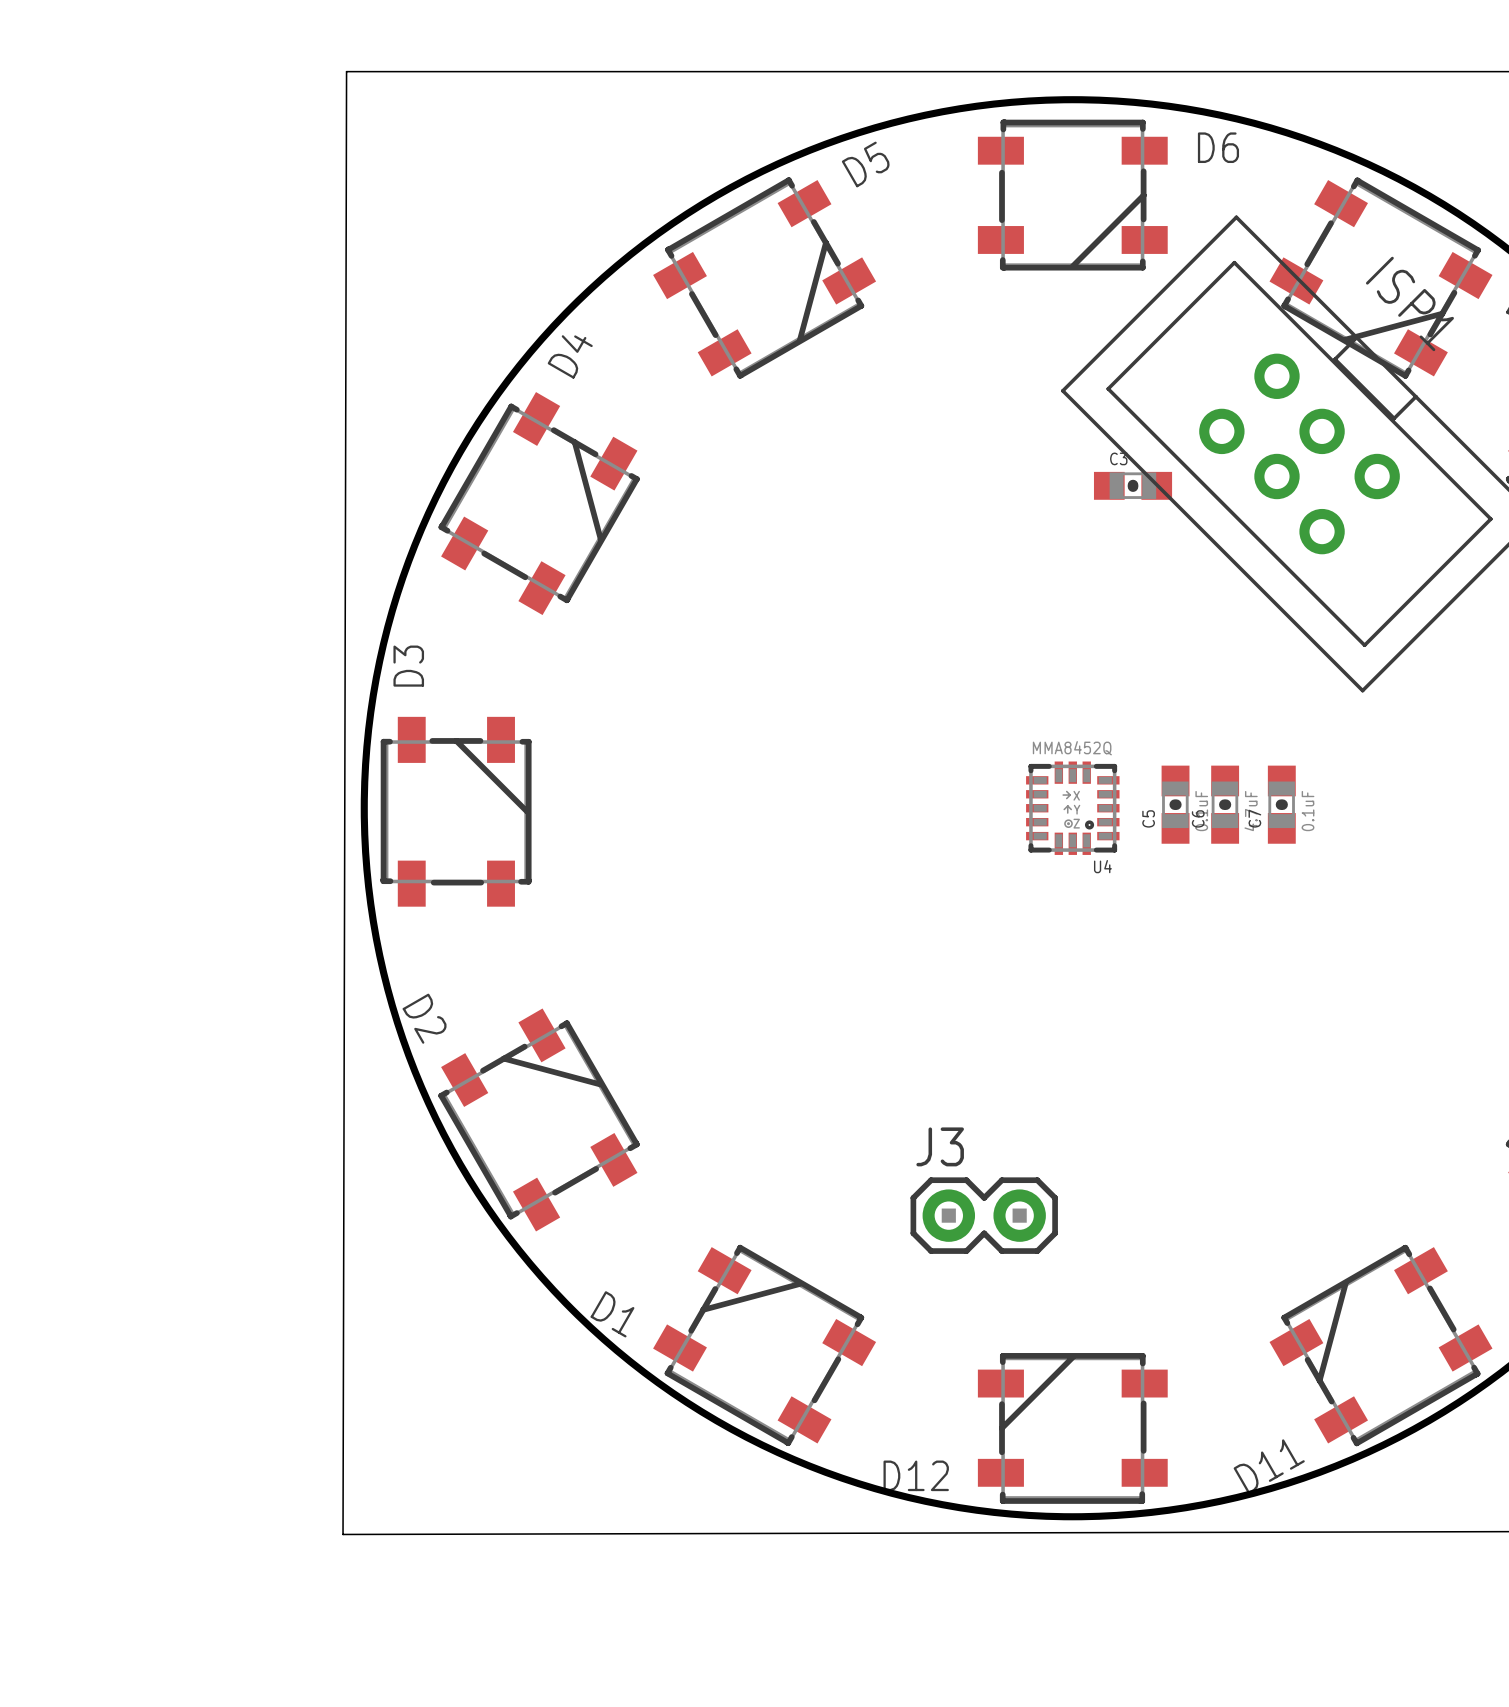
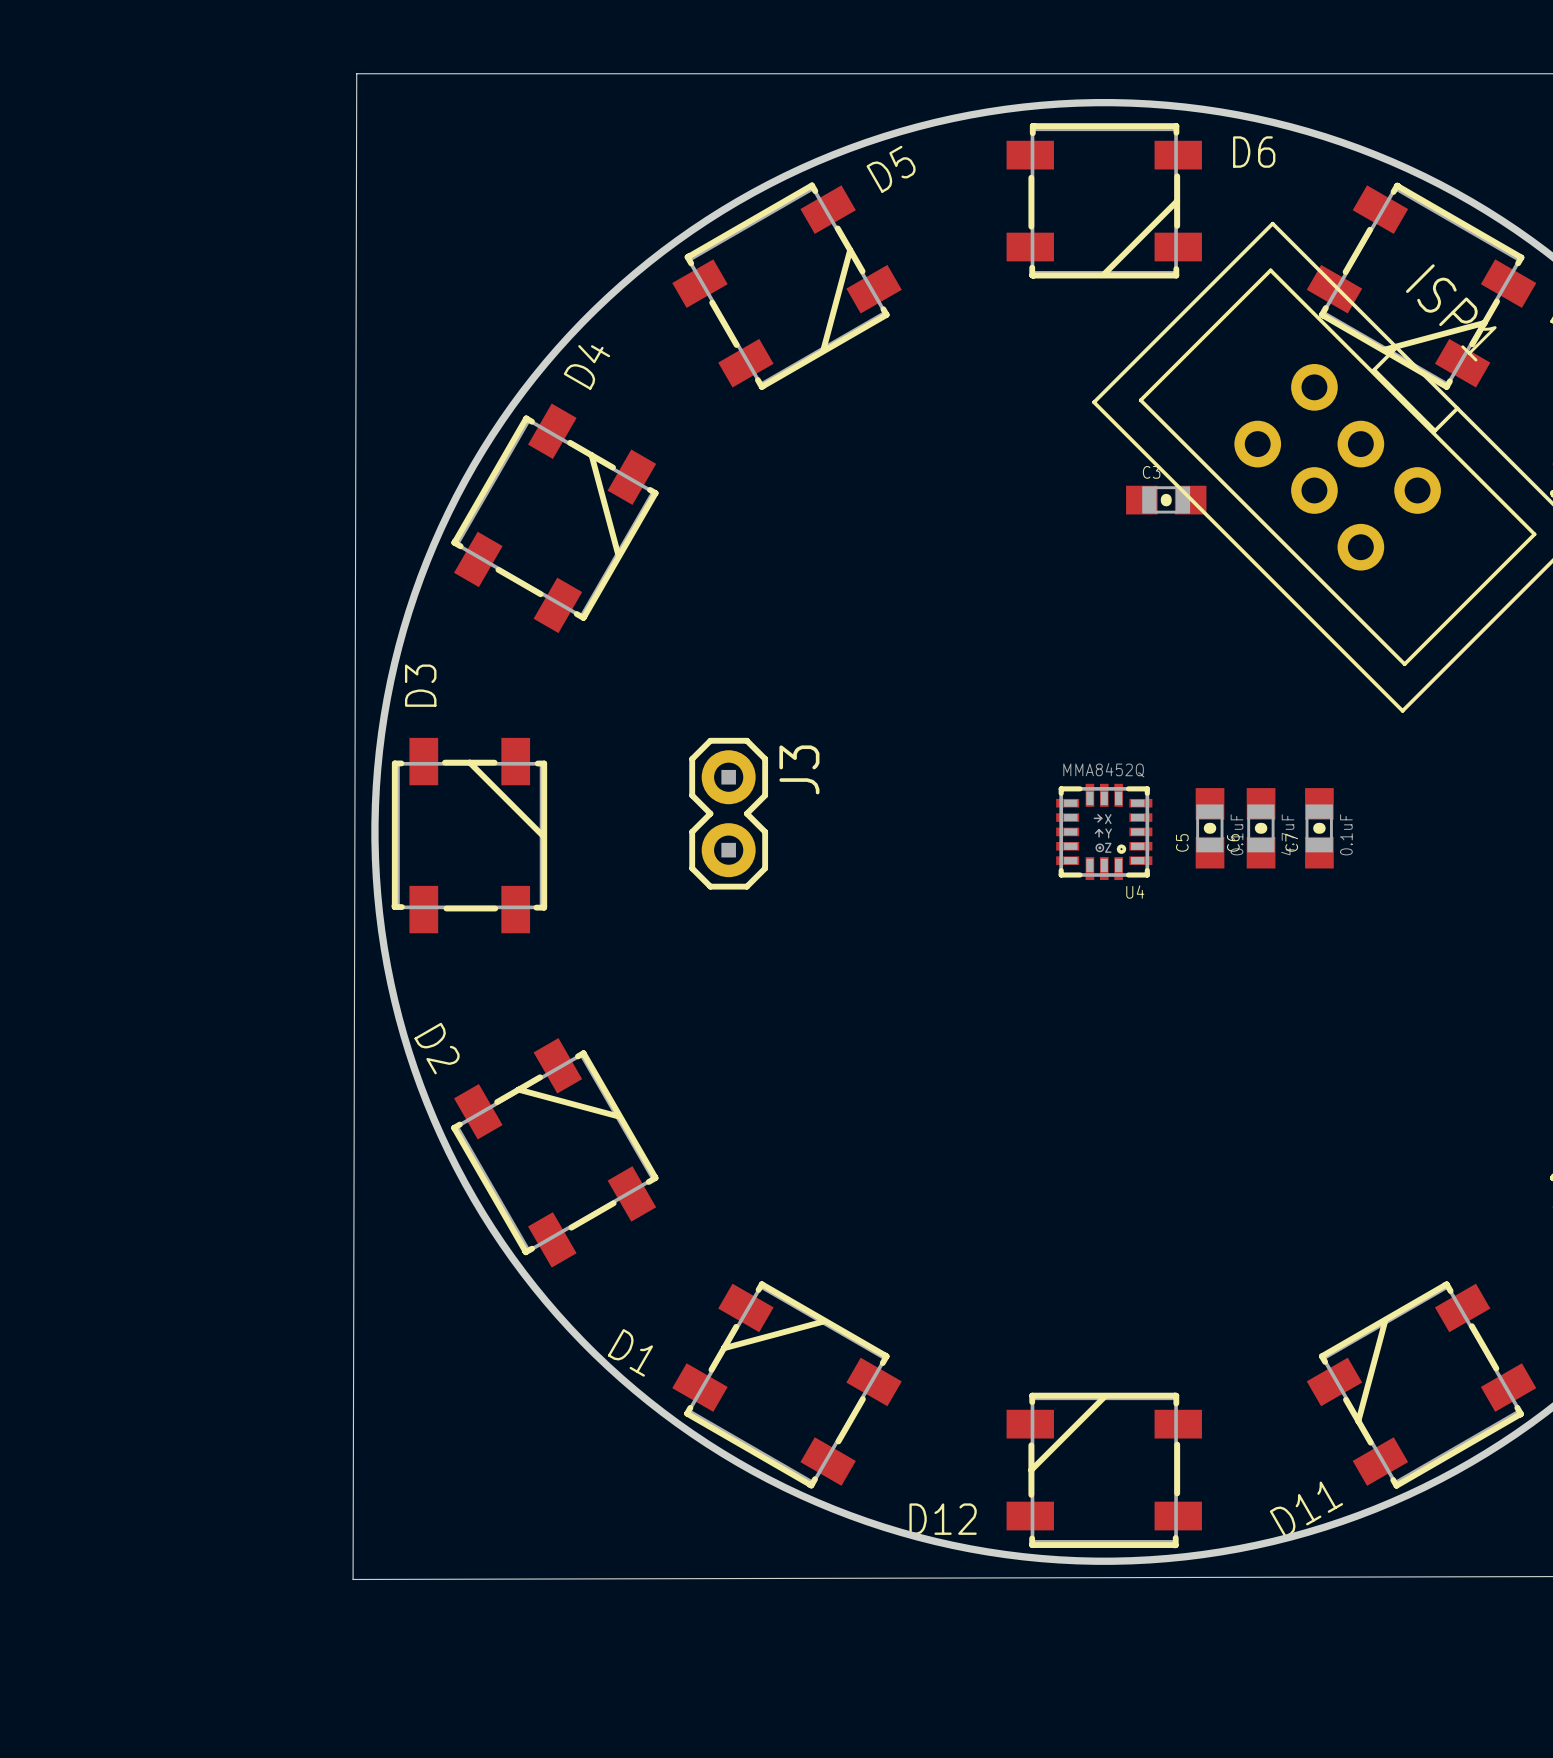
J3 rotation: 0° (984, 1215) -> 90° clockwise (728, 813)
J3 position: (984, 1215) -> (728, 813)

